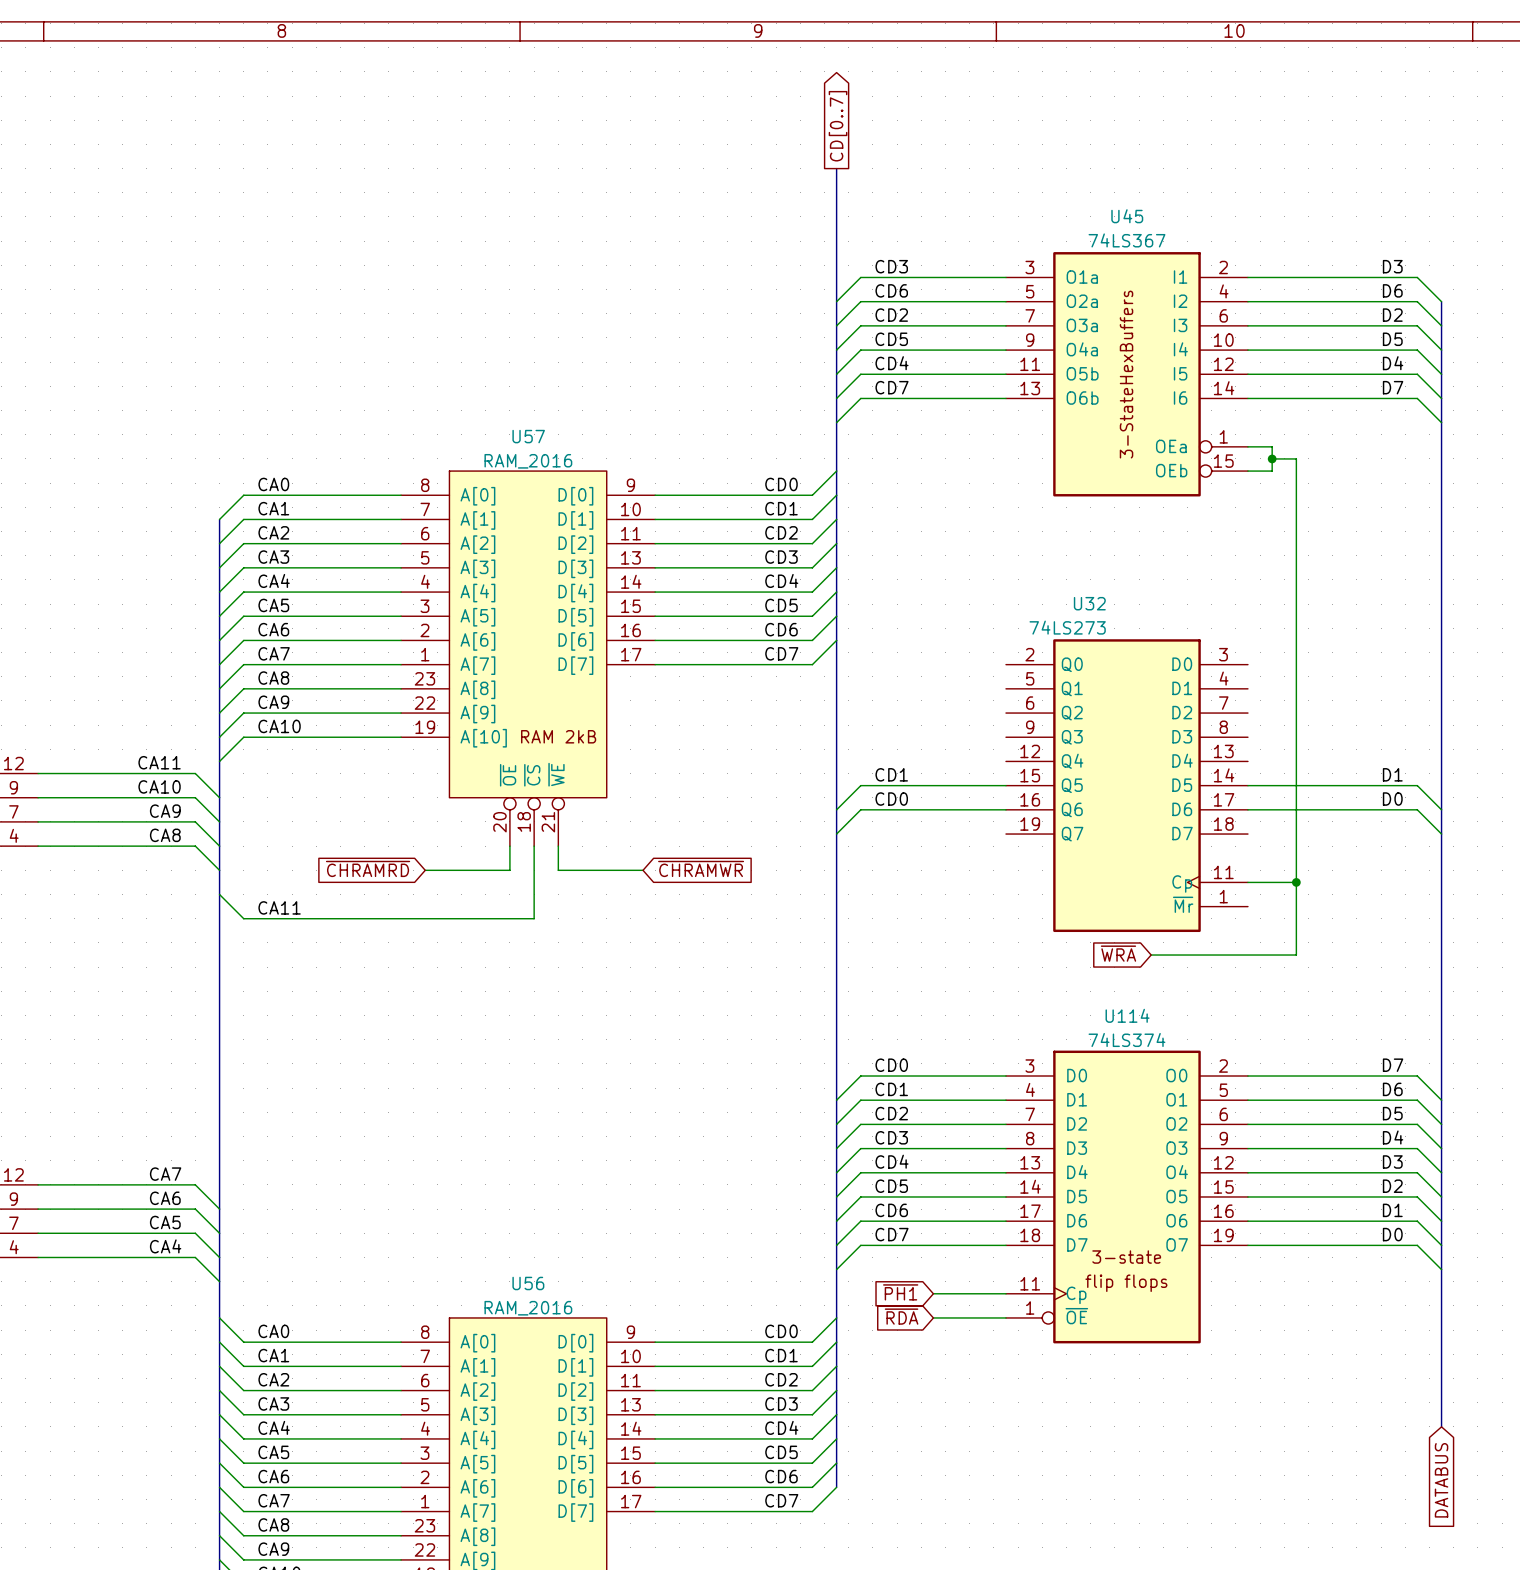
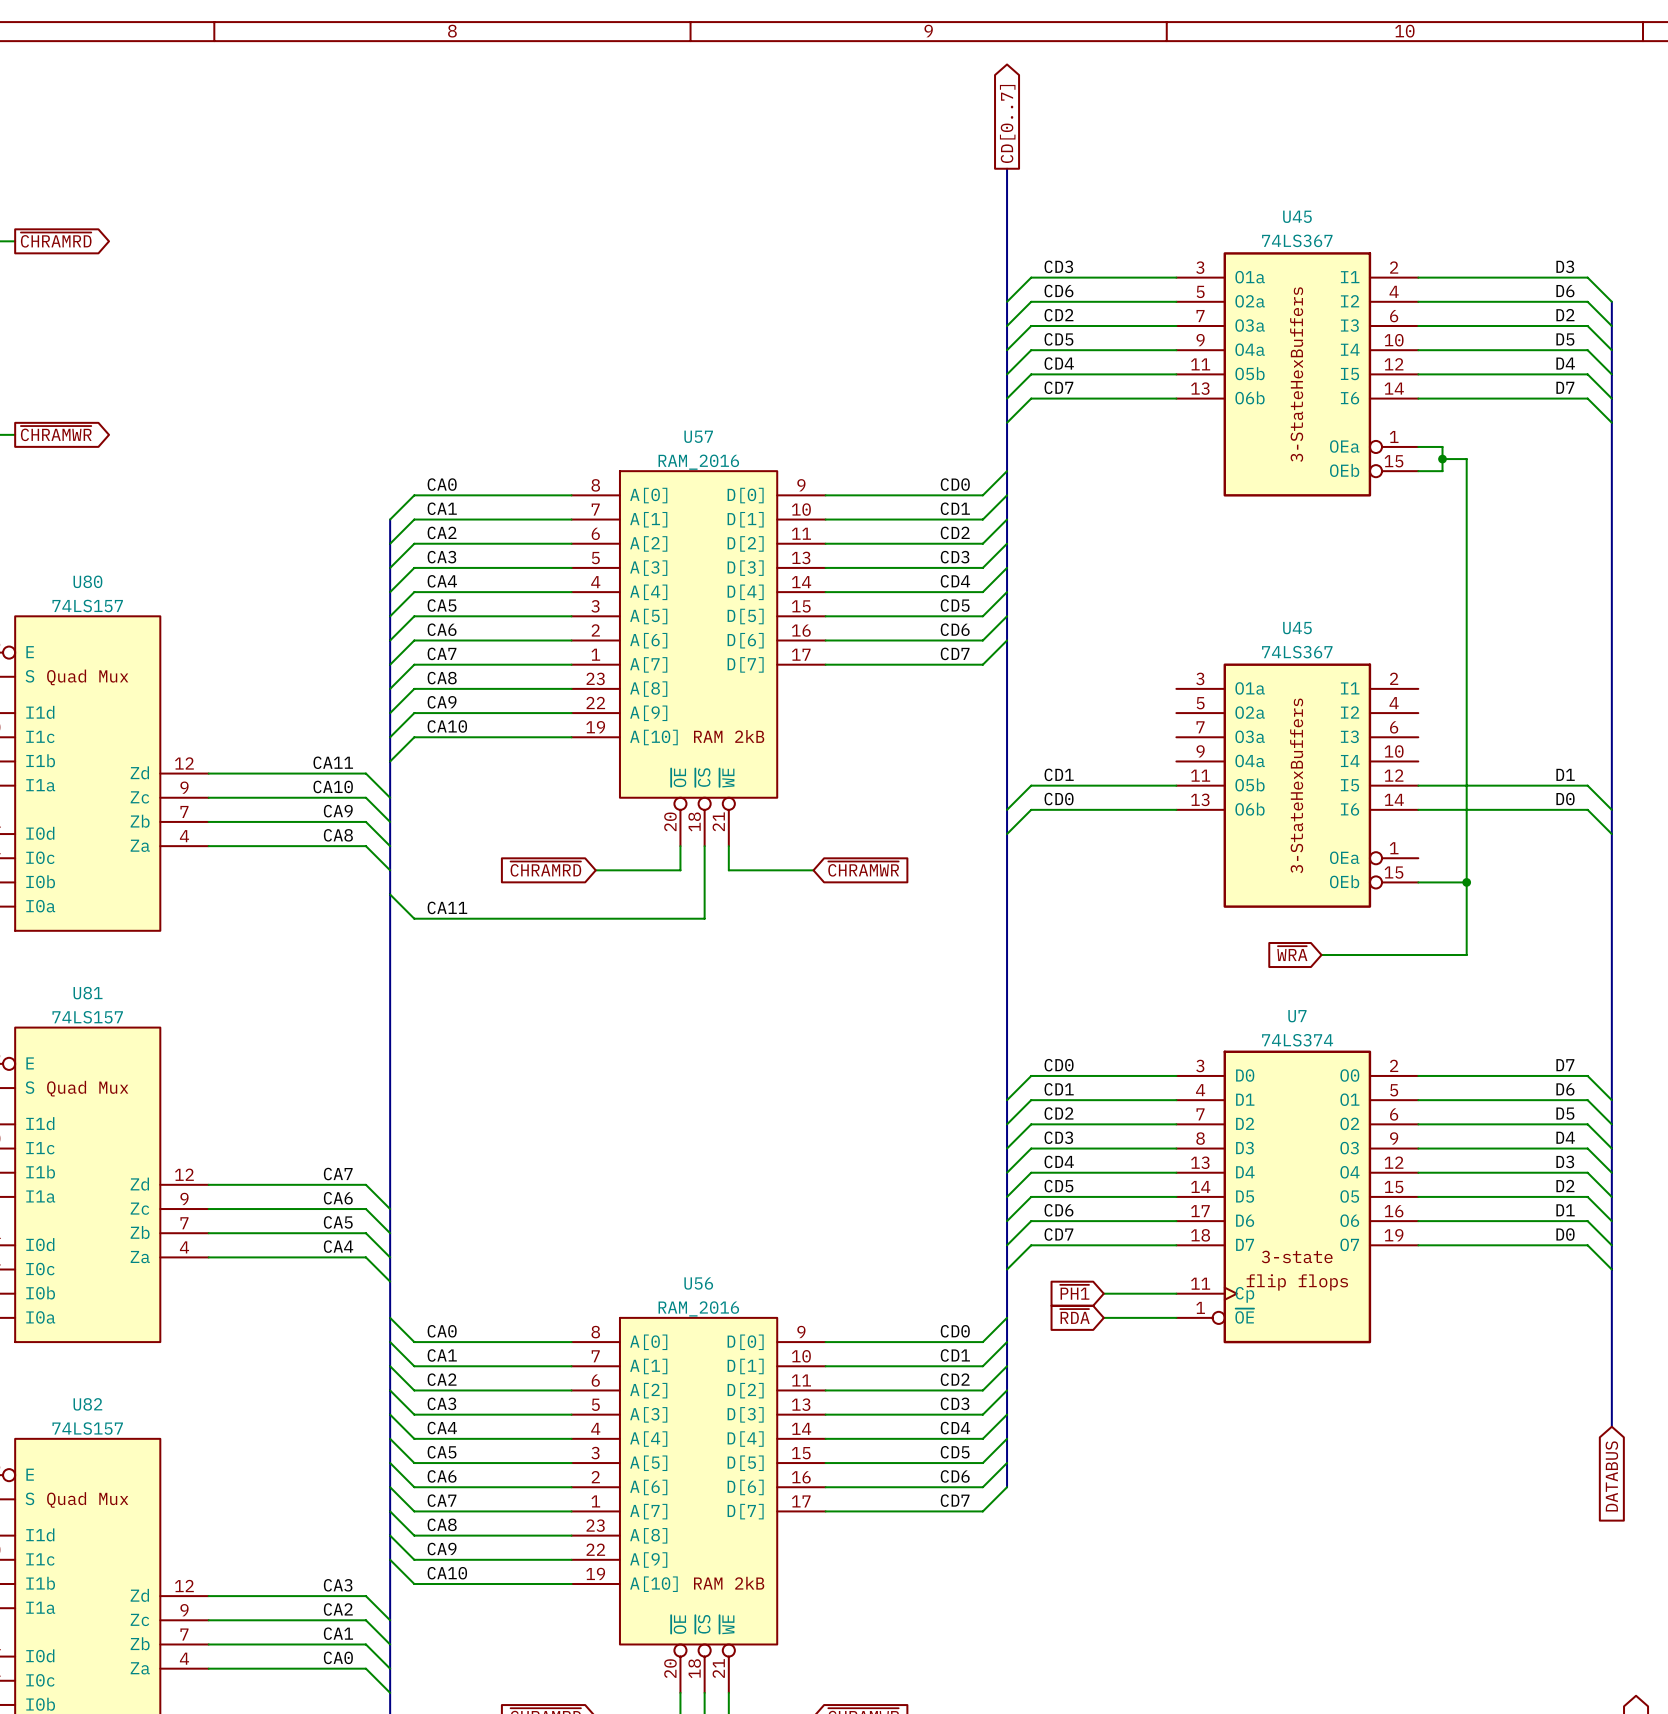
U32: 74LS273 (1126, 785) -> none
U45: none -> 74LS367 (1297, 785)
U114 name: U114 (1127, 1015) -> U7 (1297, 1016)

